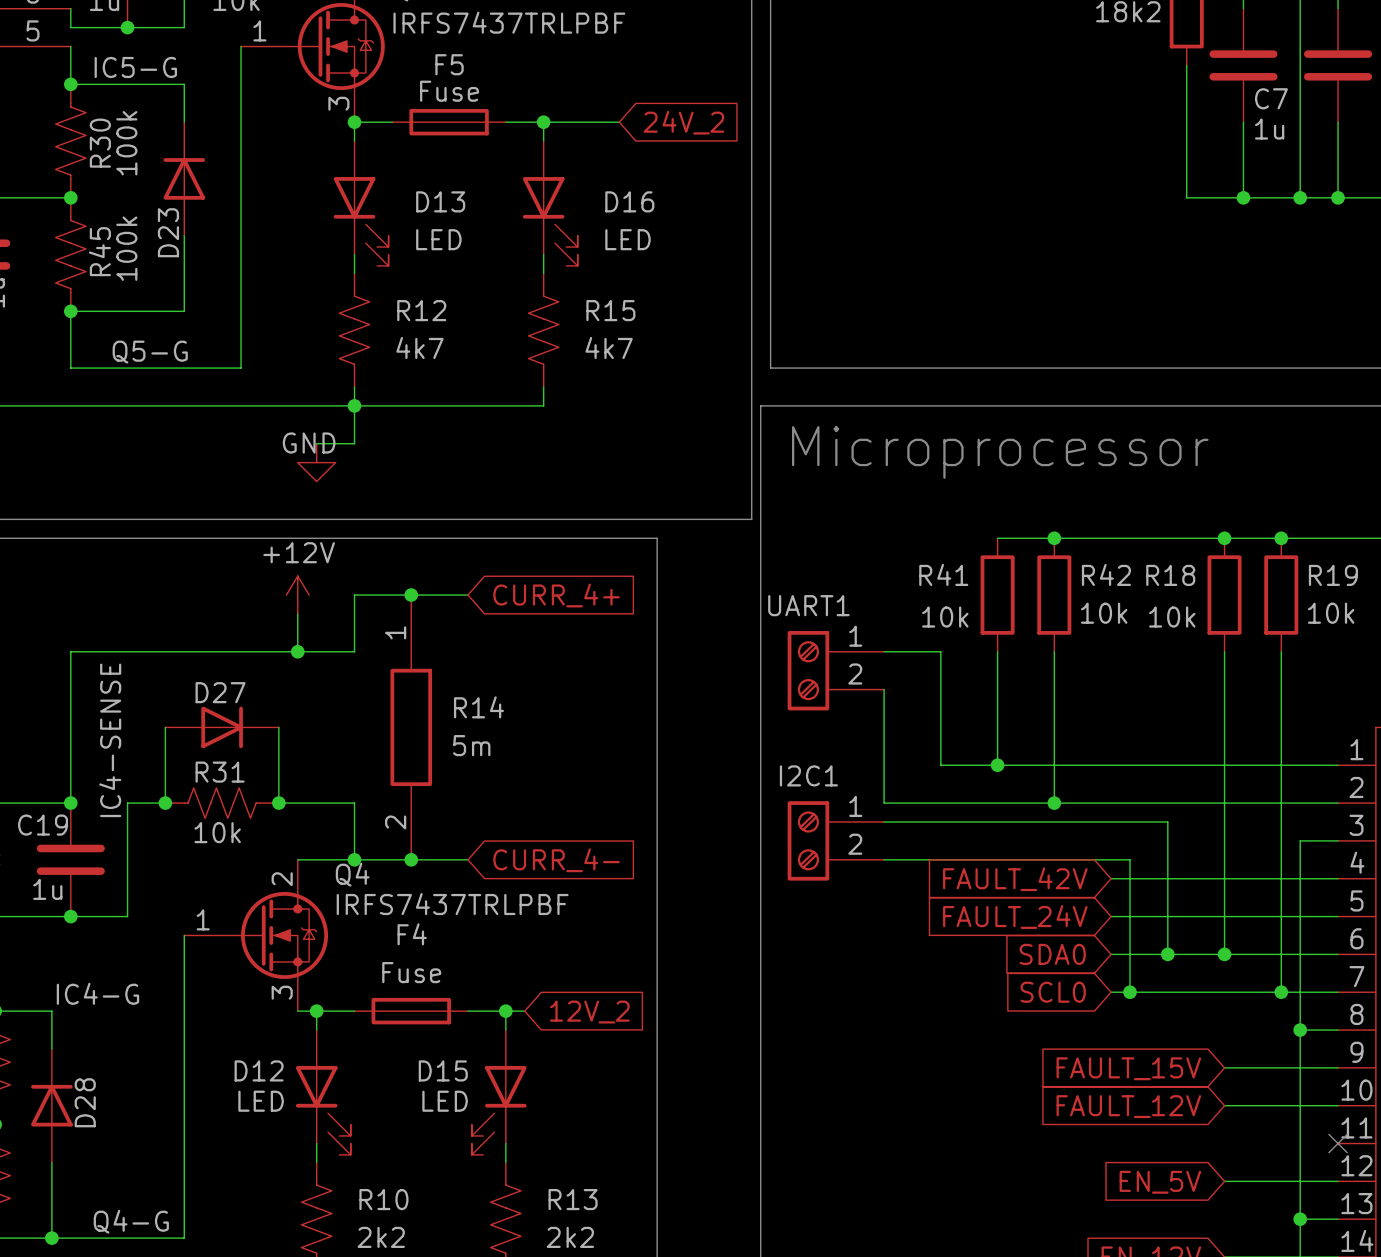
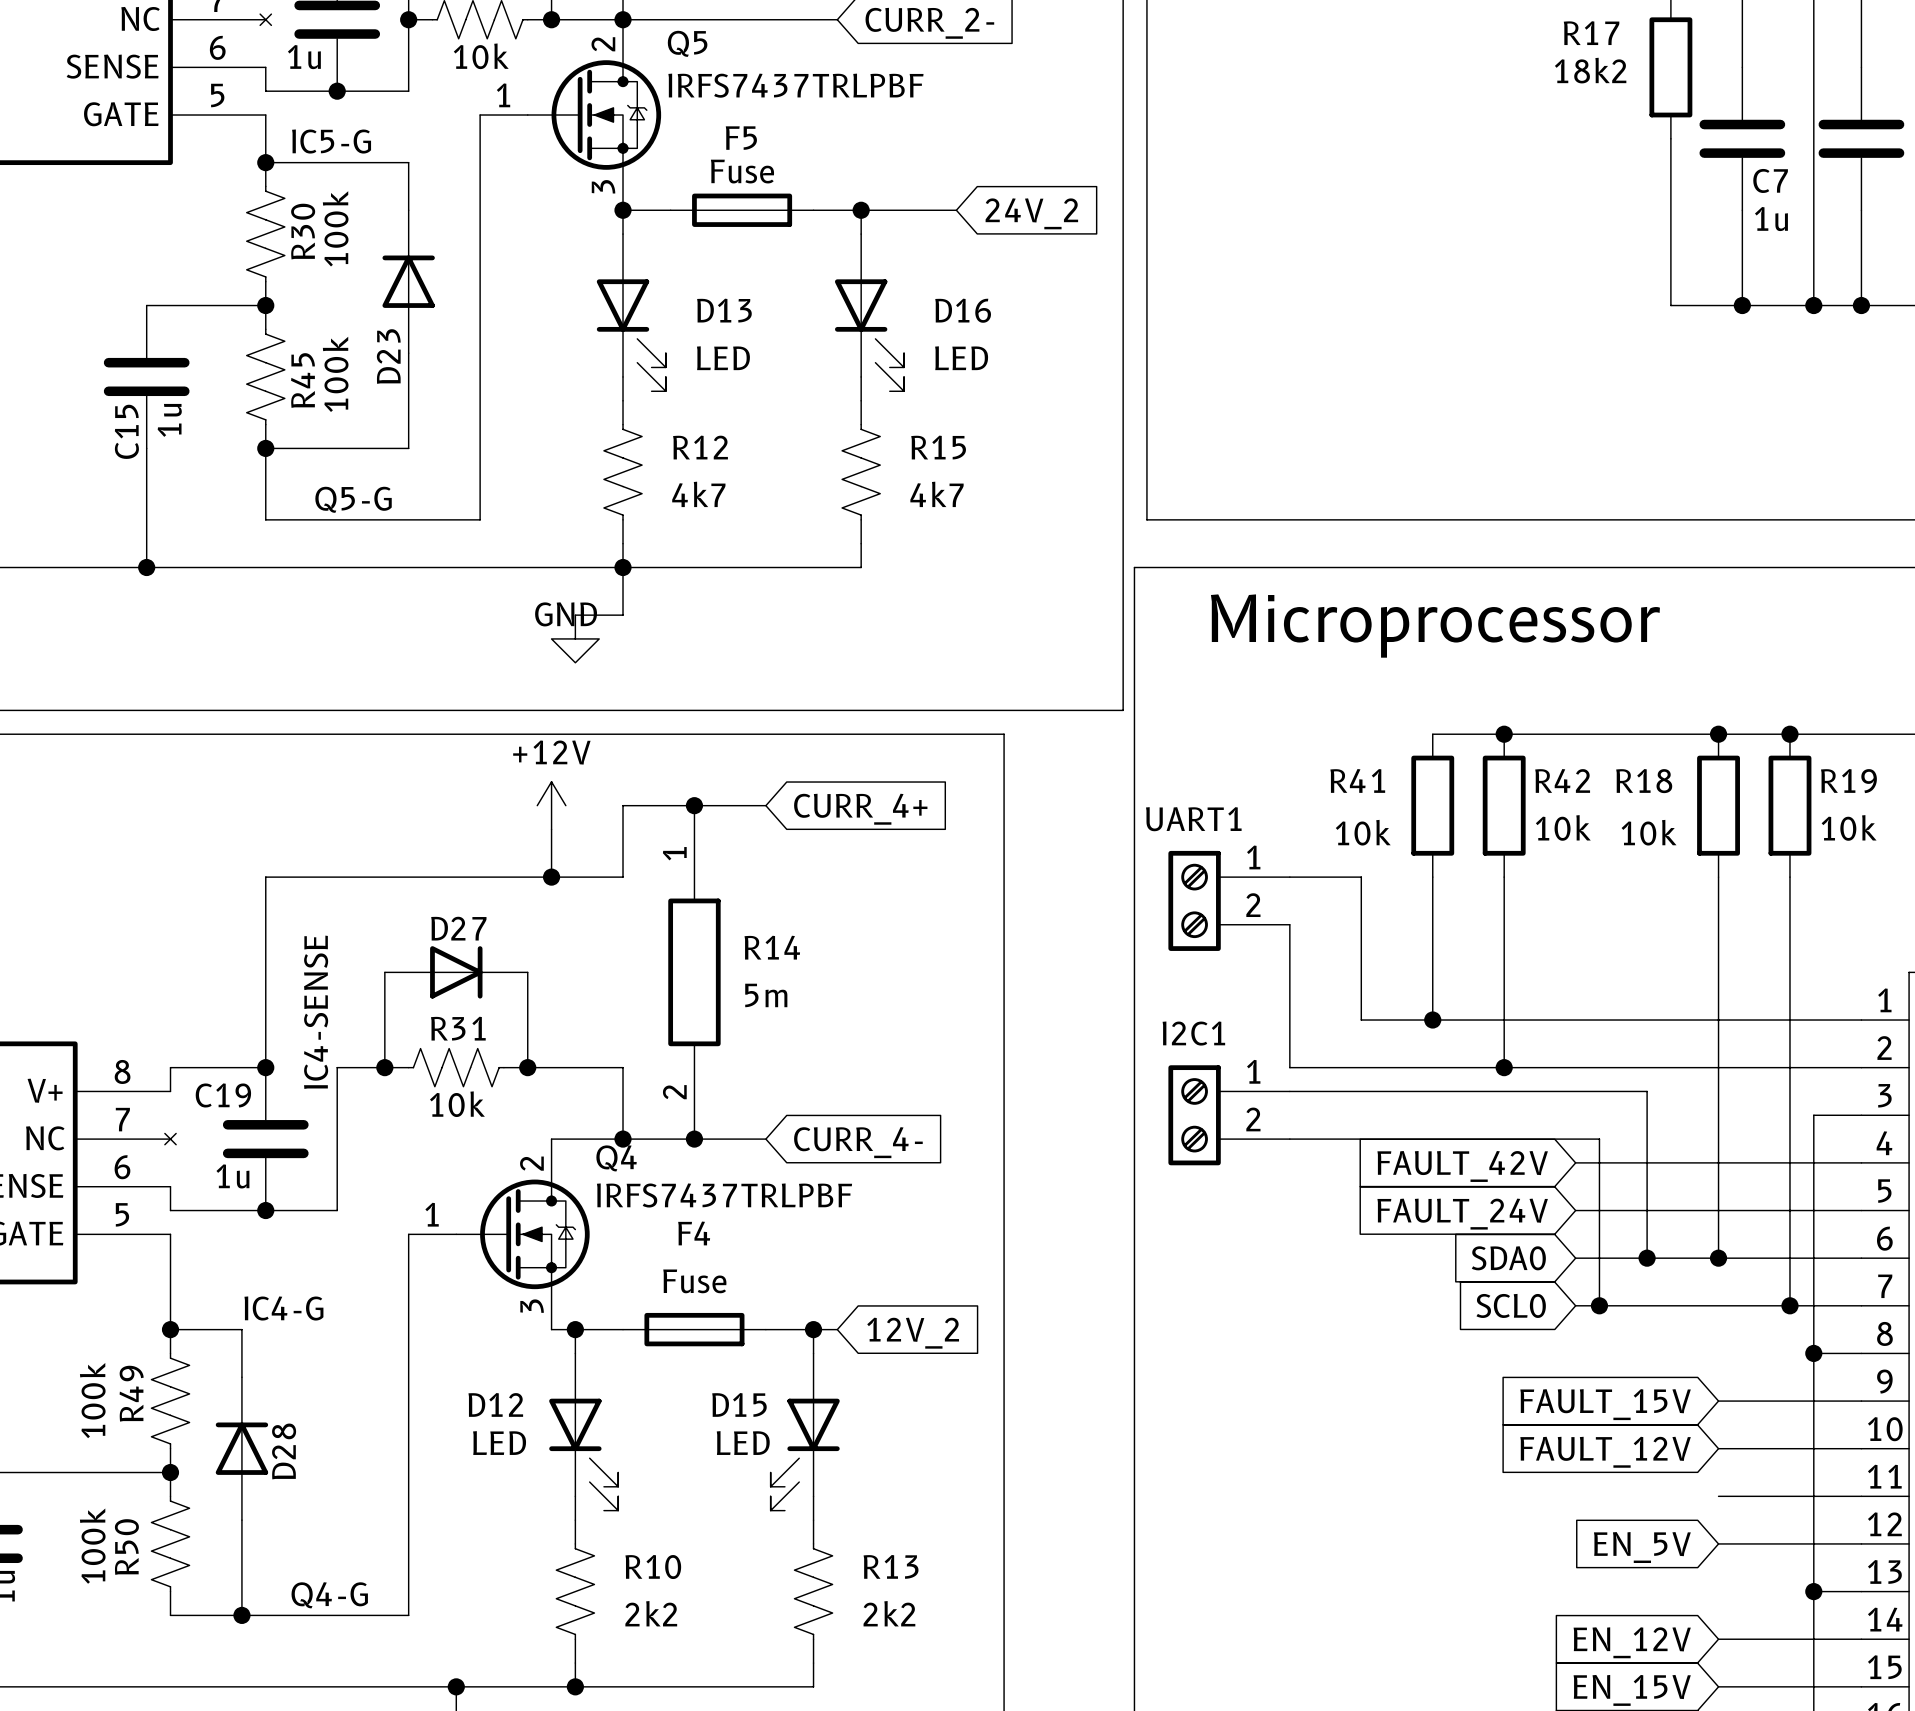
wire: none -> (1718, 1496) (1861, 1496)
no-connect mark: (1338, 1143) -> none

